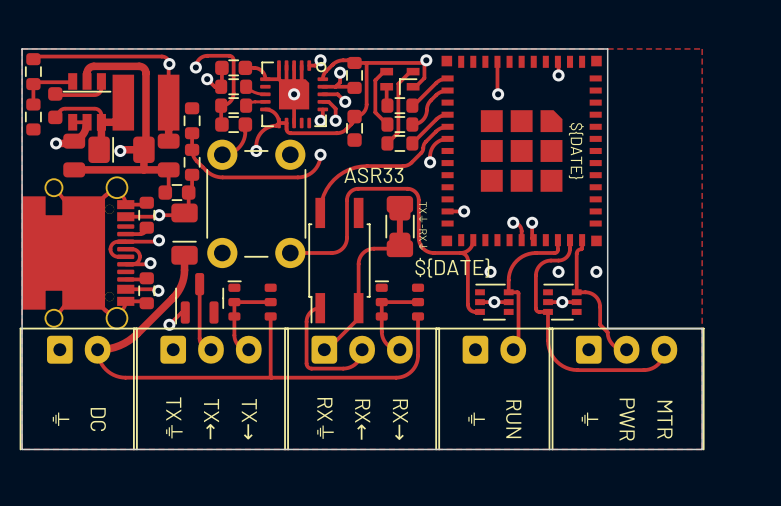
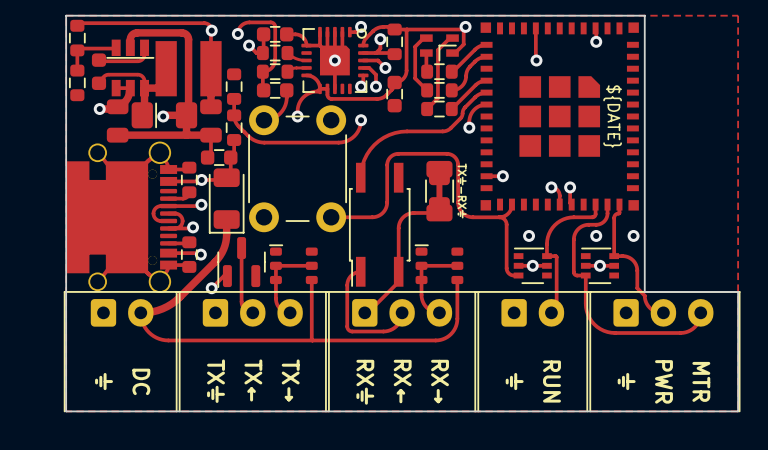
text: ASR33 (373, 175) -> none
part footprint: [171, 203, 198, 265] -> [208, 168, 245, 234]
text: ${DATE} (453, 267) -> none

